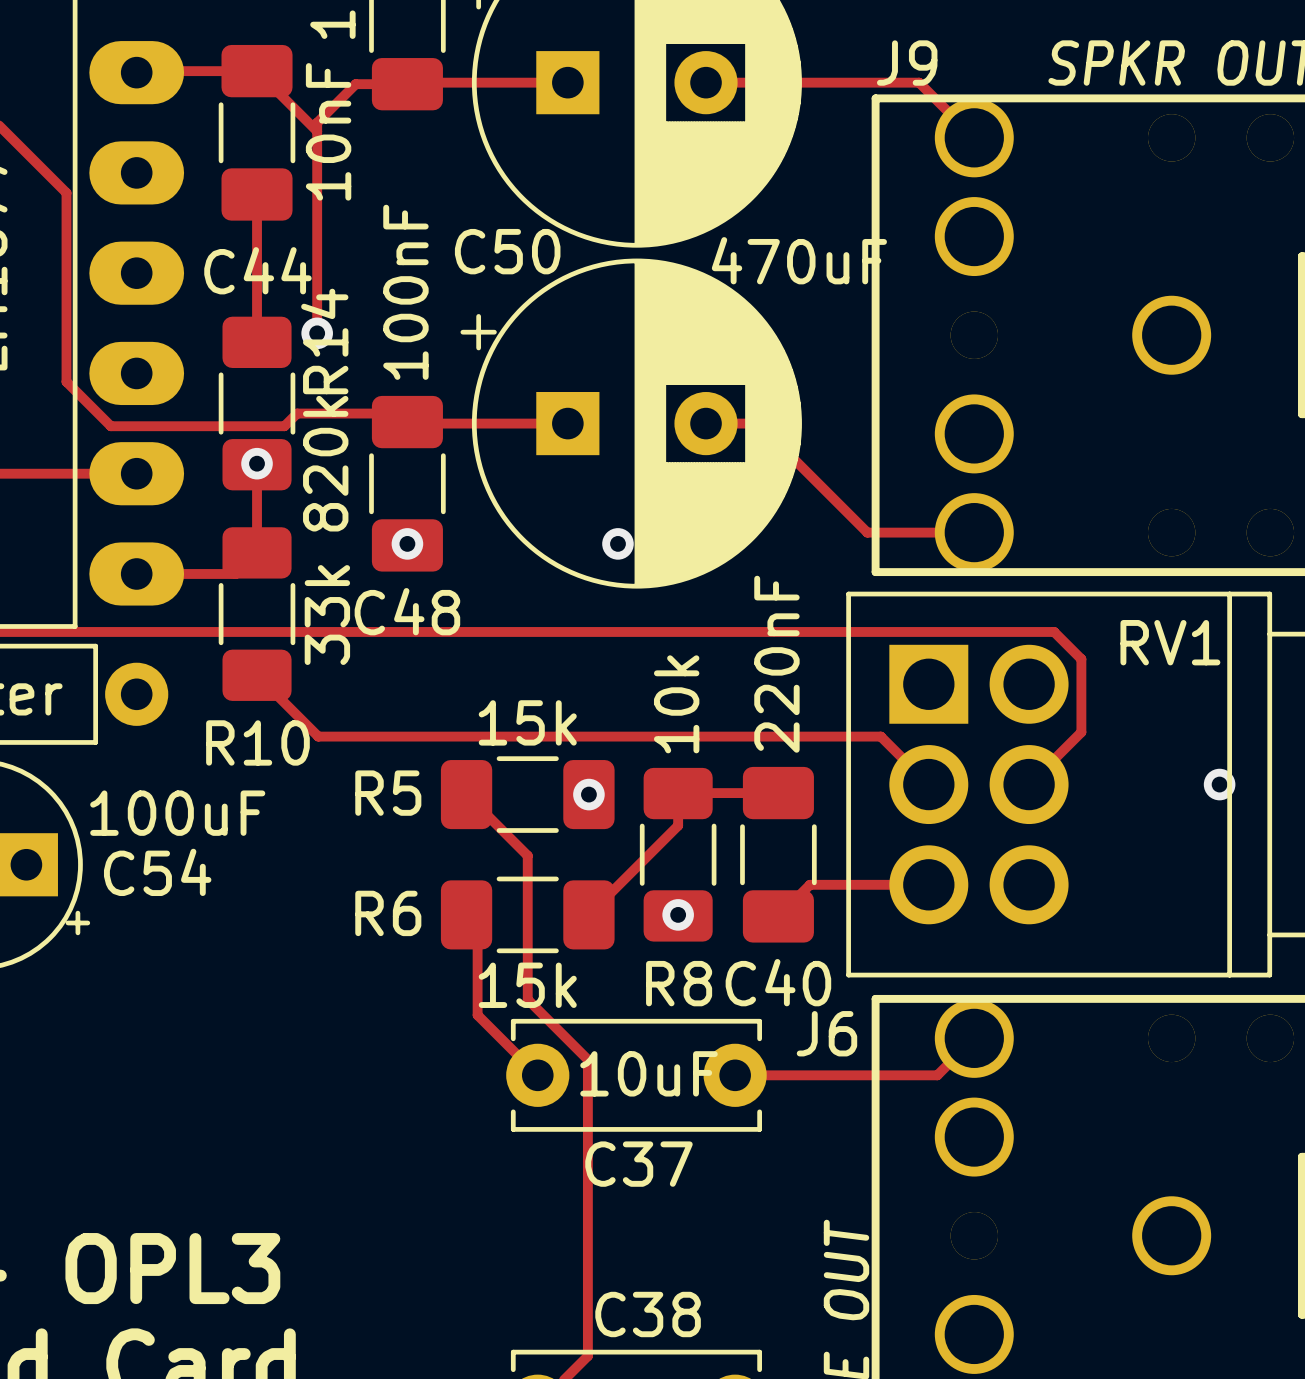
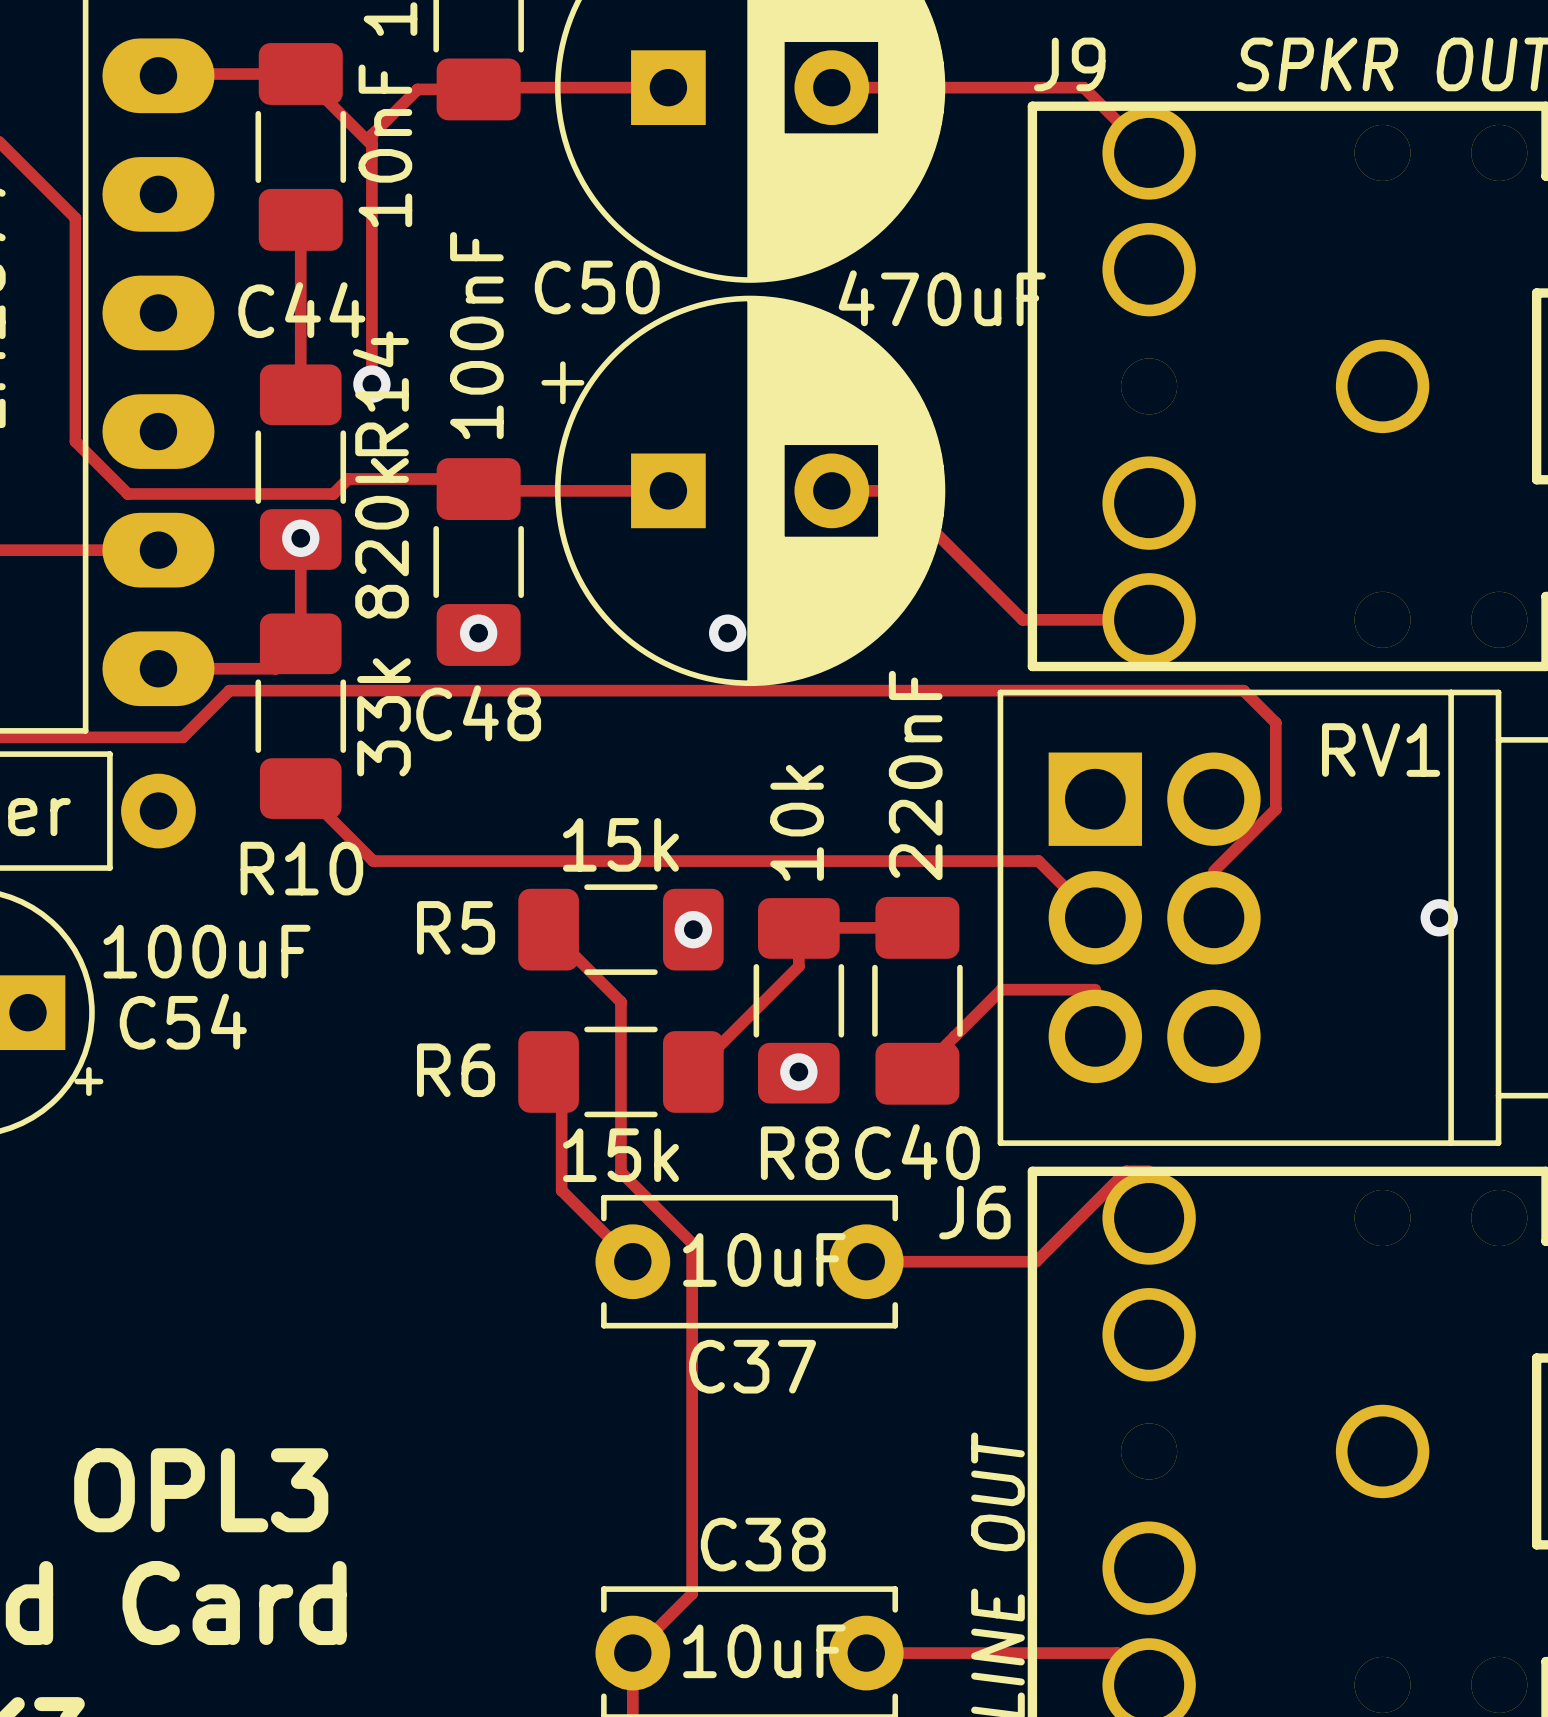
track: (157, 631) (1054, 631) (1081, 659) -> (182, 737) (229, 690) (1243, 690) (1275, 722) (1275, 769)
track: (1081, 692) (1081, 732) (1029, 784) -> (1275, 809) (1213, 871)
track: (810, 884) (928, 884) -> (954, 1036) (1001, 989) (1095, 989)
track: (974, 1038) (937, 1075) (878, 1075) -> (1149, 1171) (1126, 1171) (1036, 1261)

